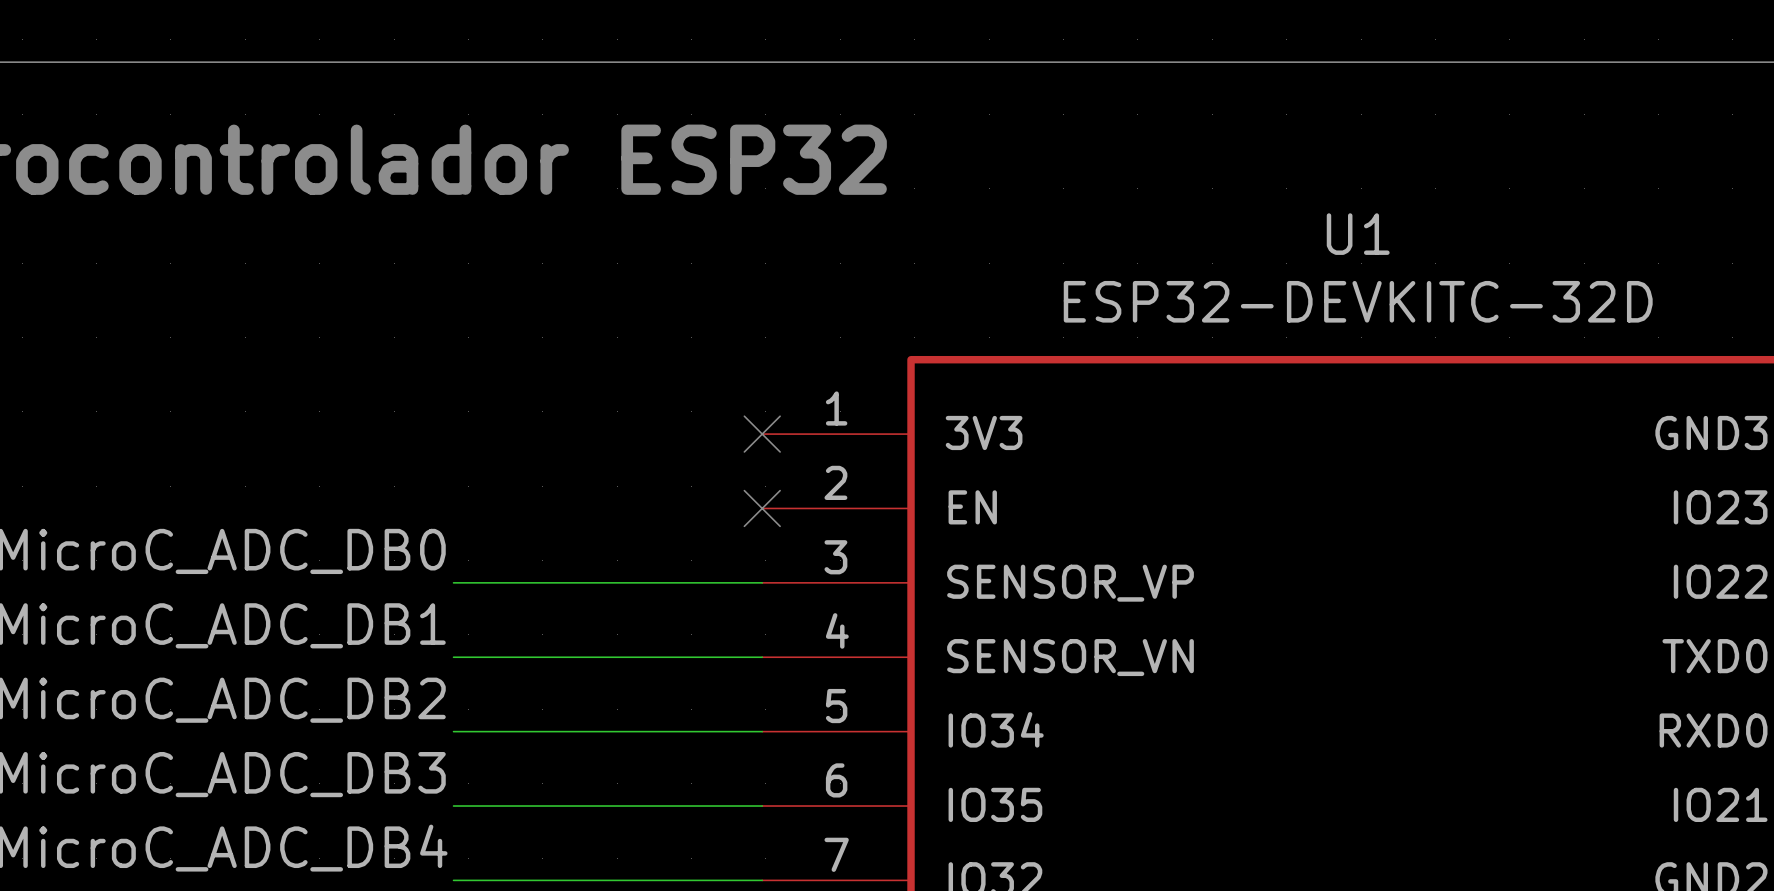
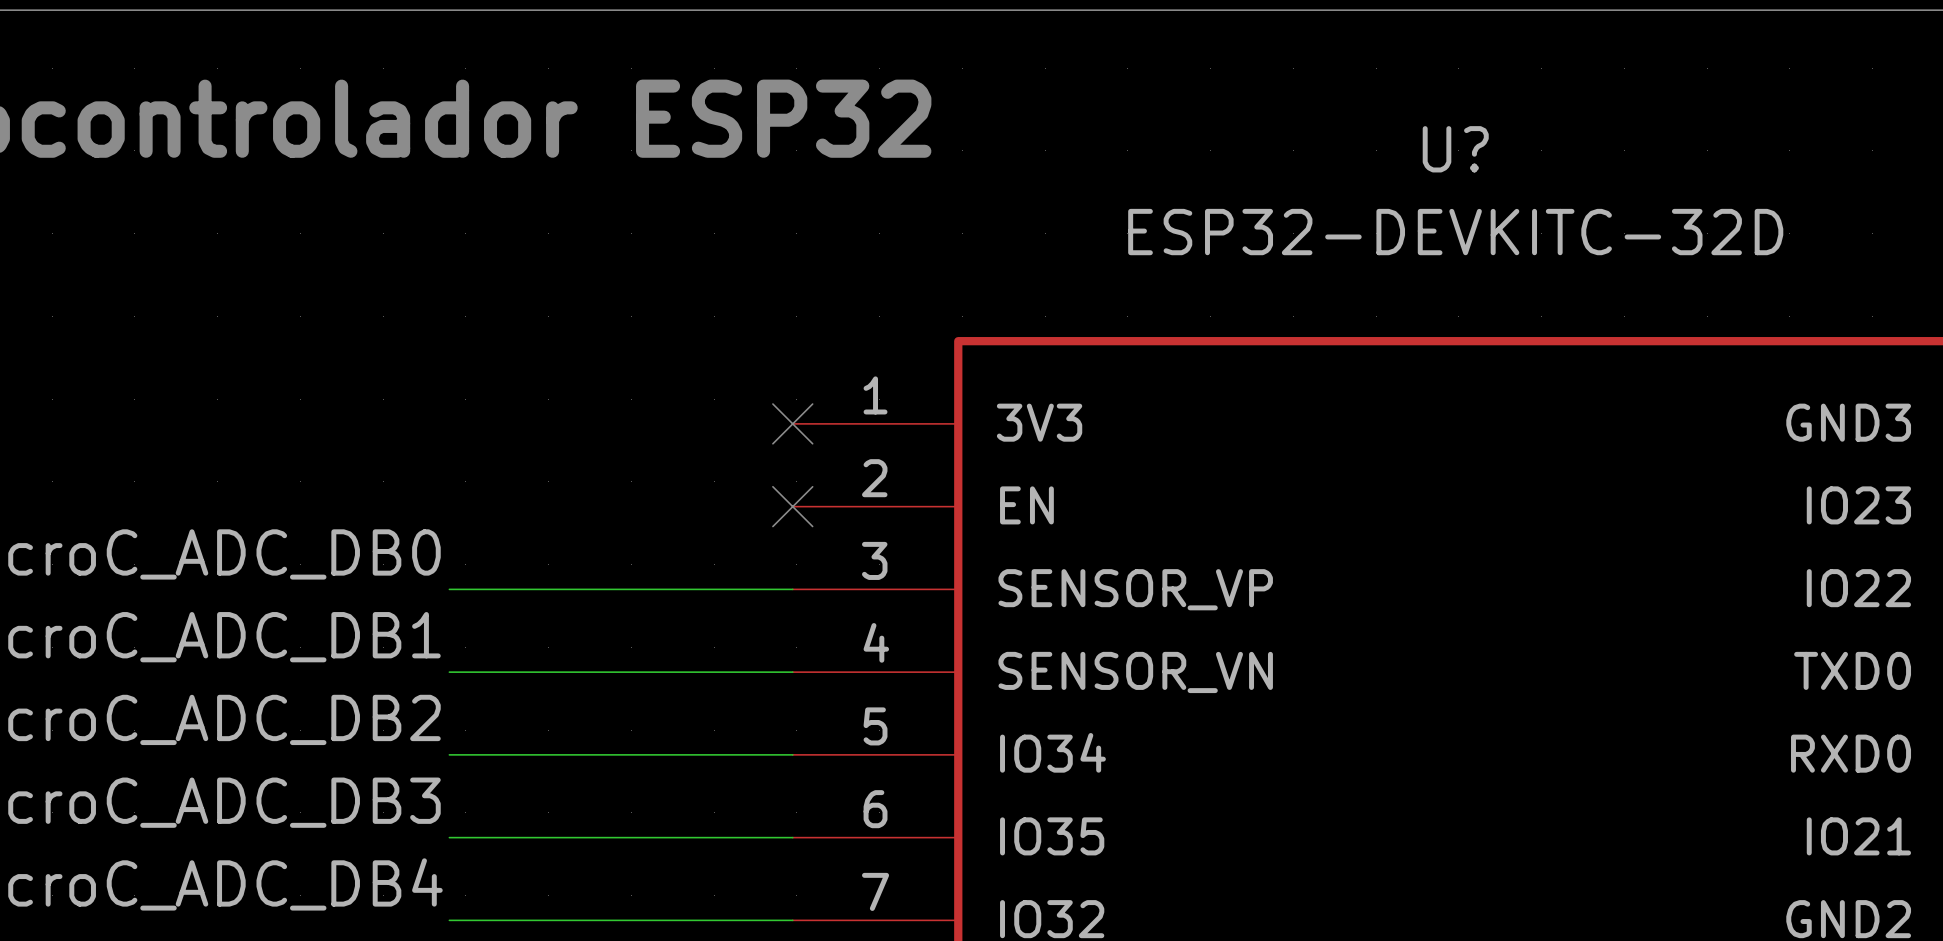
U1 name: U1 (1358, 234) -> U? (1455, 149)
U1 value position: ESP32-DEVKITC-32D (1358, 301) -> ESP32-DEVKITC-32D (1455, 232)

